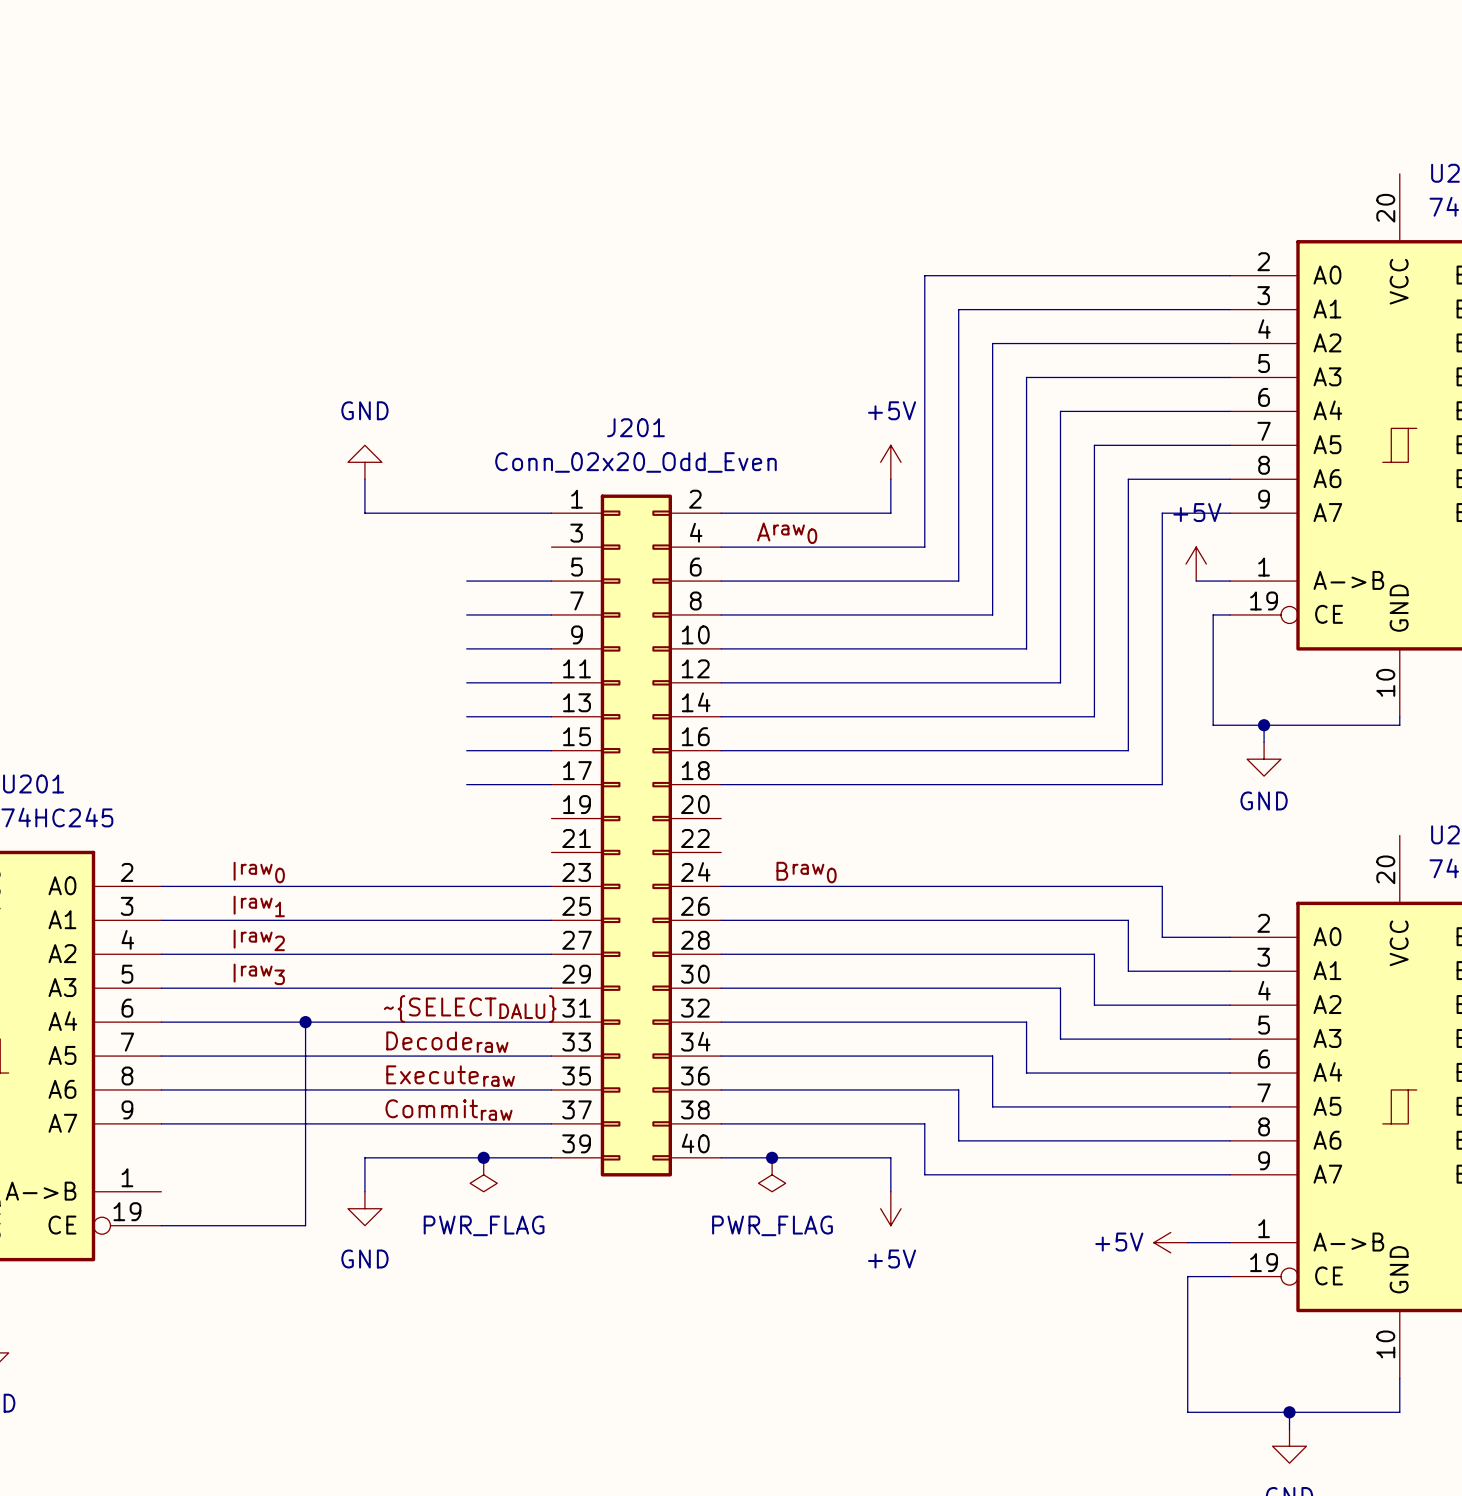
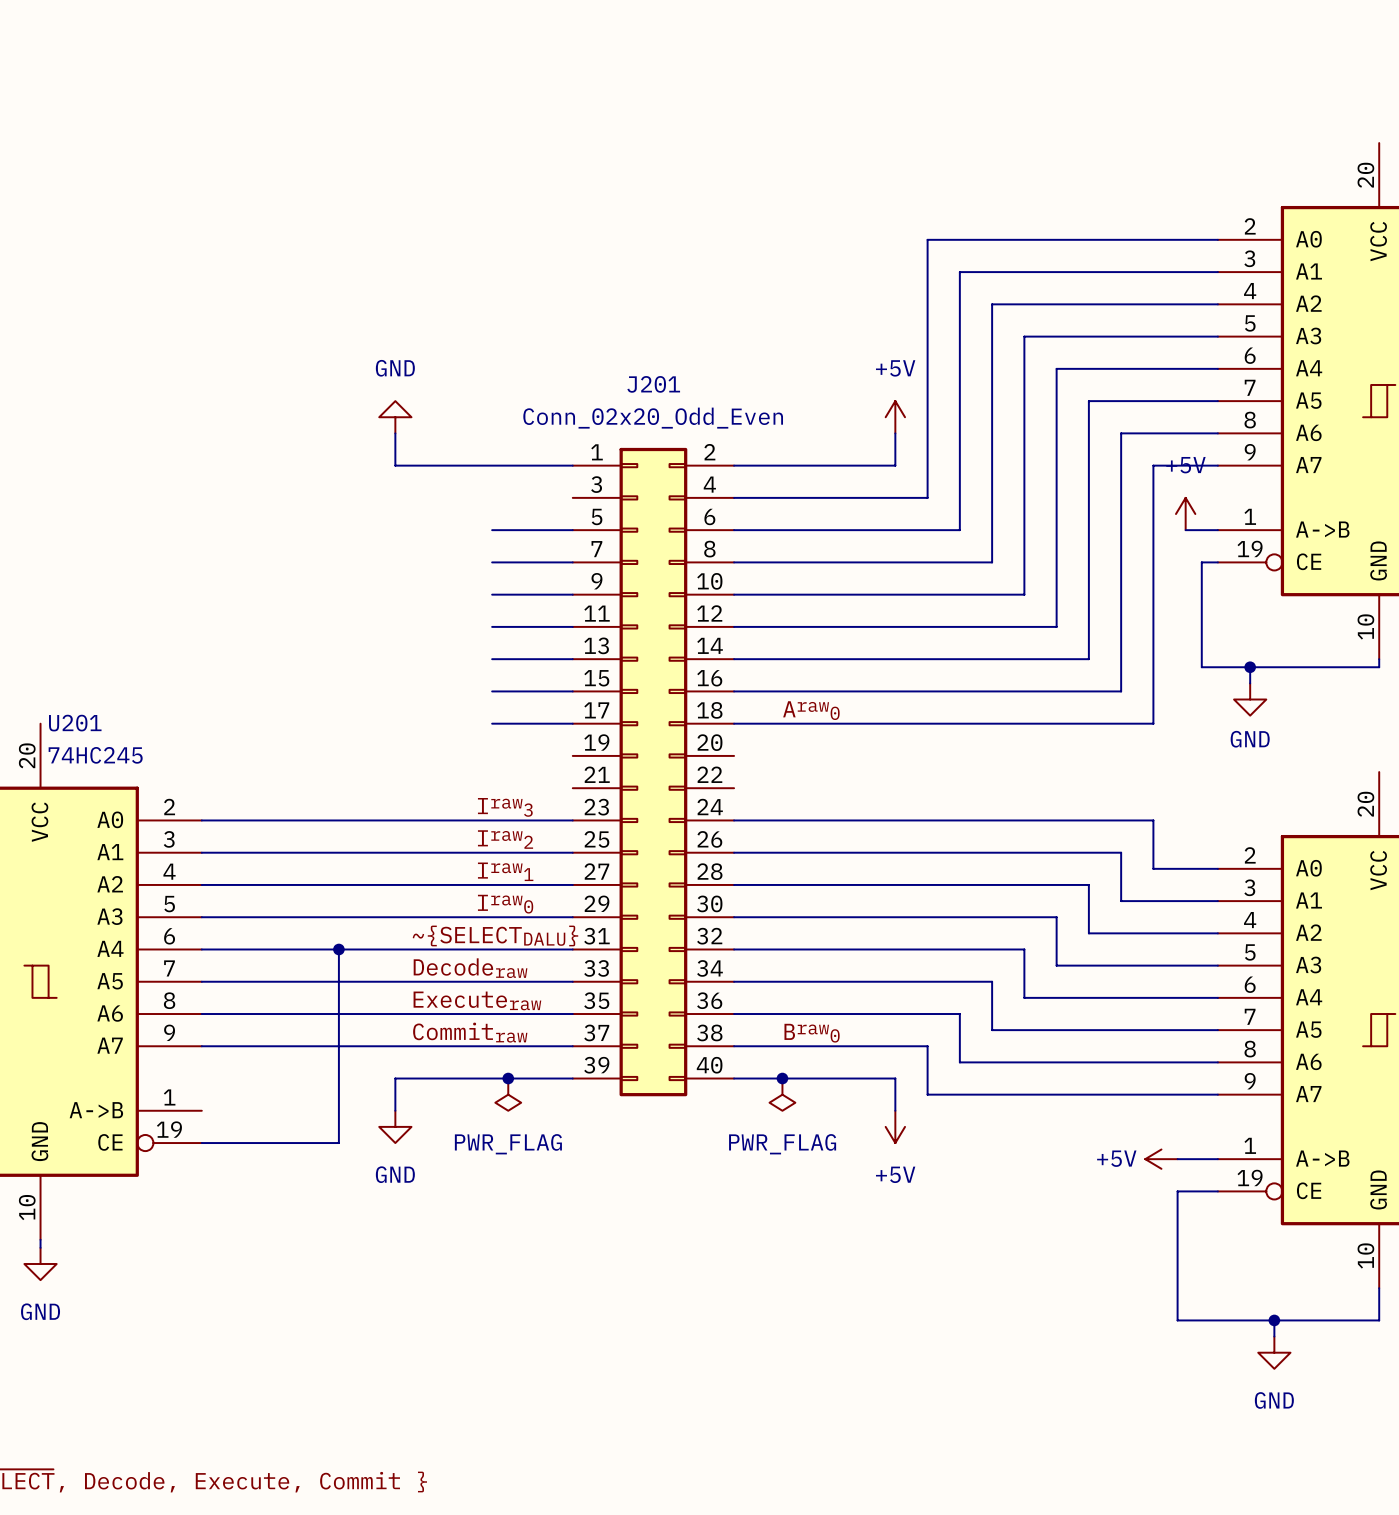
label position: Araw0 (787, 533) -> Araw0 (811, 710)
label position: Iraw0 (259, 872) -> Iraw0 (505, 904)
label position: Braw0 (806, 872) -> Braw0 (812, 1033)
label position: Iraw1 (259, 906) -> Iraw1 (505, 871)
label position: Iraw2 (259, 940) -> Iraw2 (505, 839)
label position: Iraw3 (259, 974) -> Iraw3 (505, 807)

